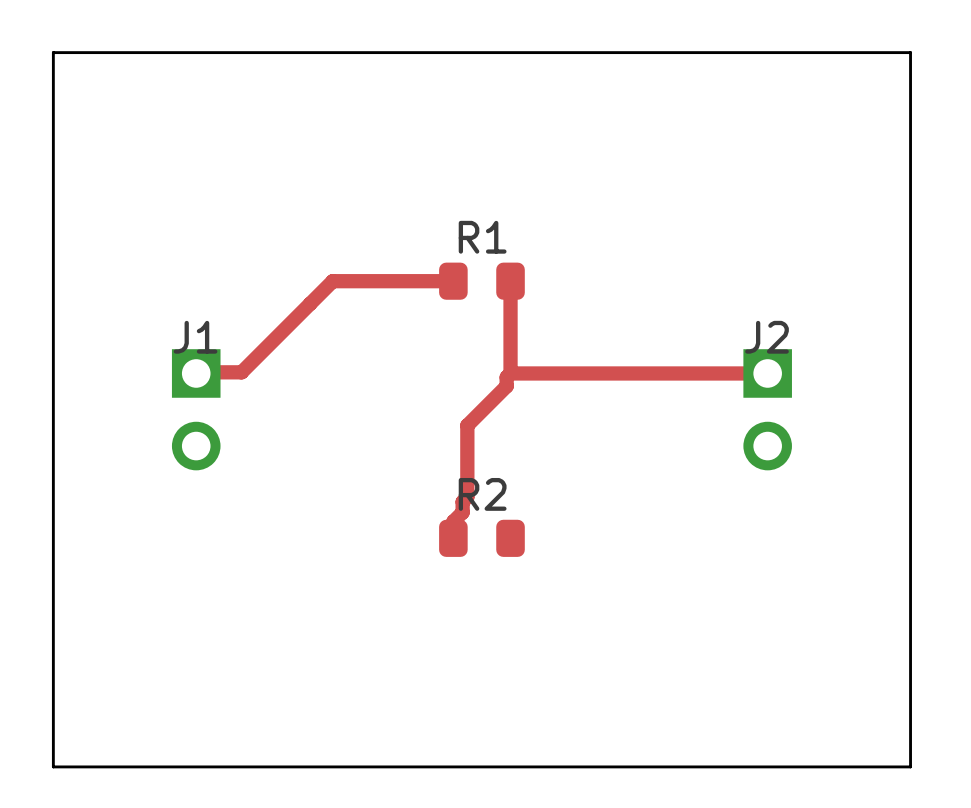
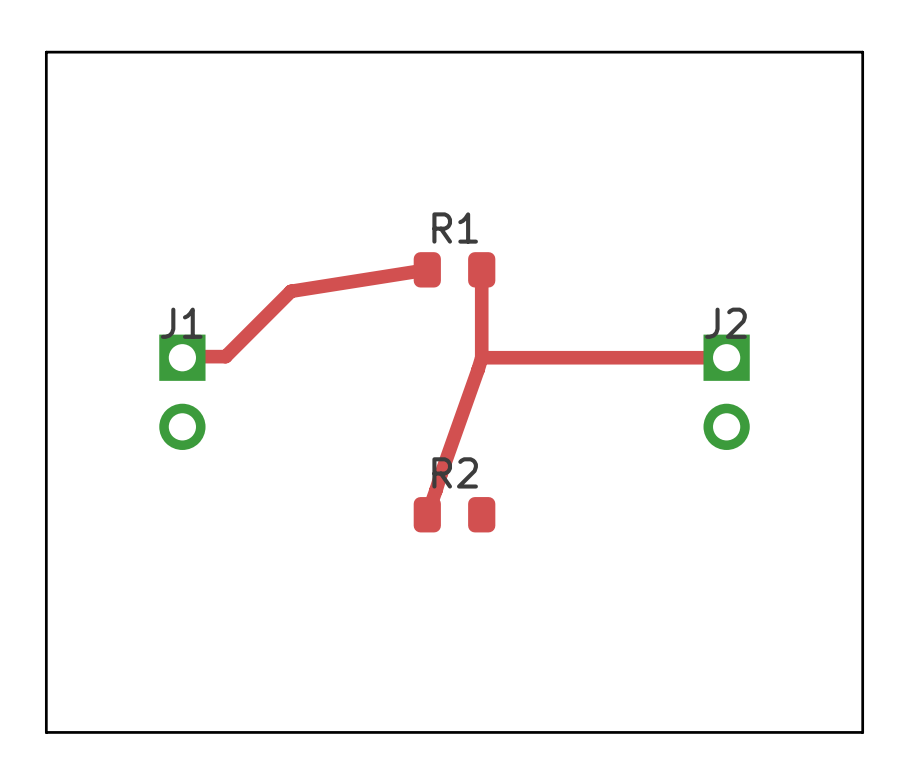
top track: (453, 281) (332, 281) (310, 303) -> (427, 269) (290, 291)
top track: (510, 373) (506, 377) (506, 386) (467, 425) (467, 497) (462, 501) (462, 512) (453, 521) (453, 538) -> (481, 357) (427, 514)

